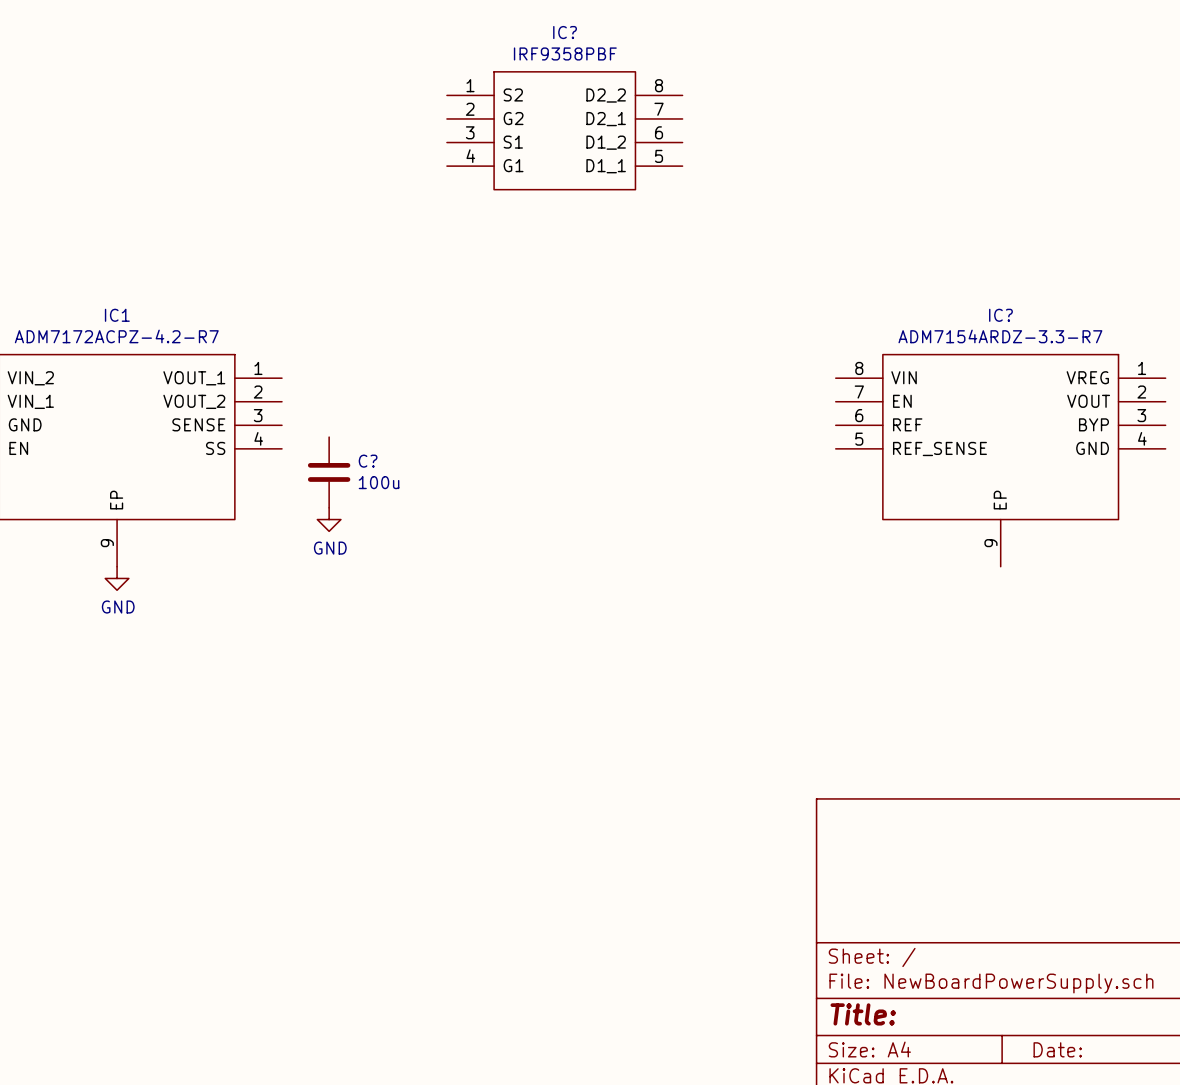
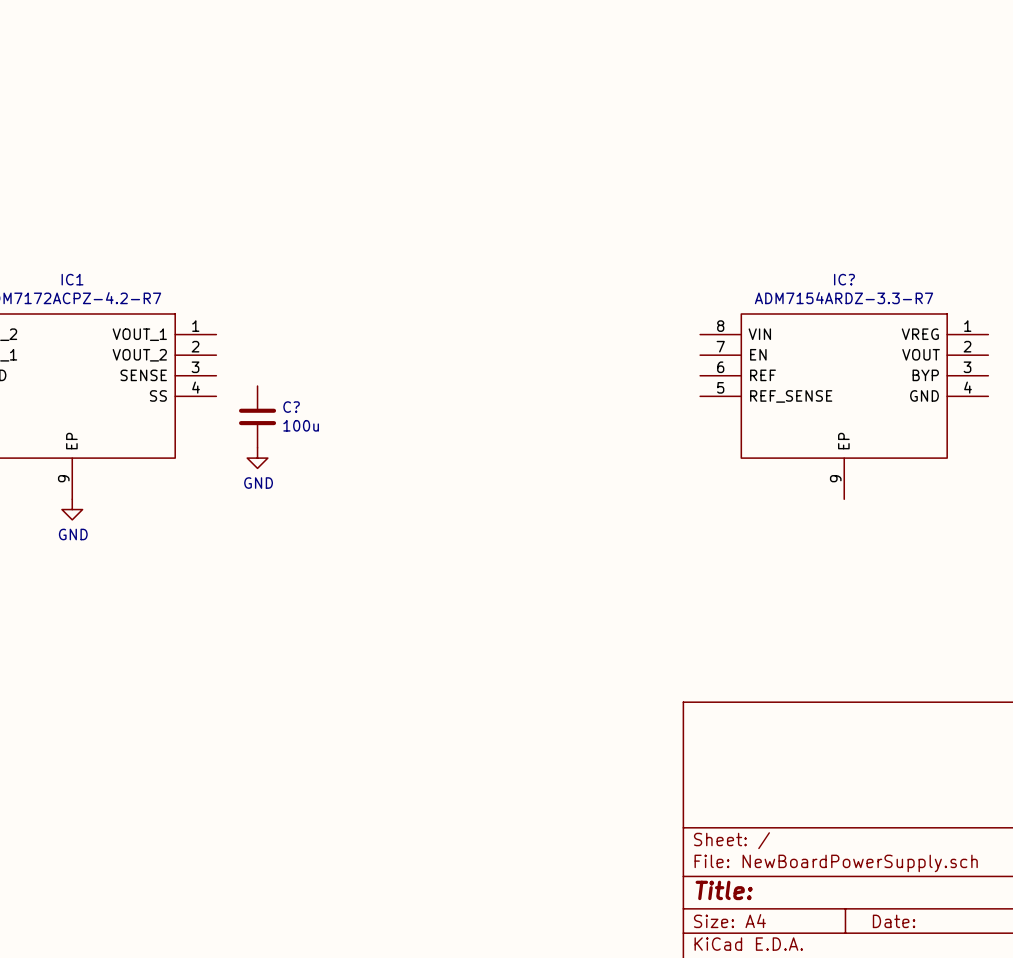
IC?: IRF9358PBF (564, 130) -> none

